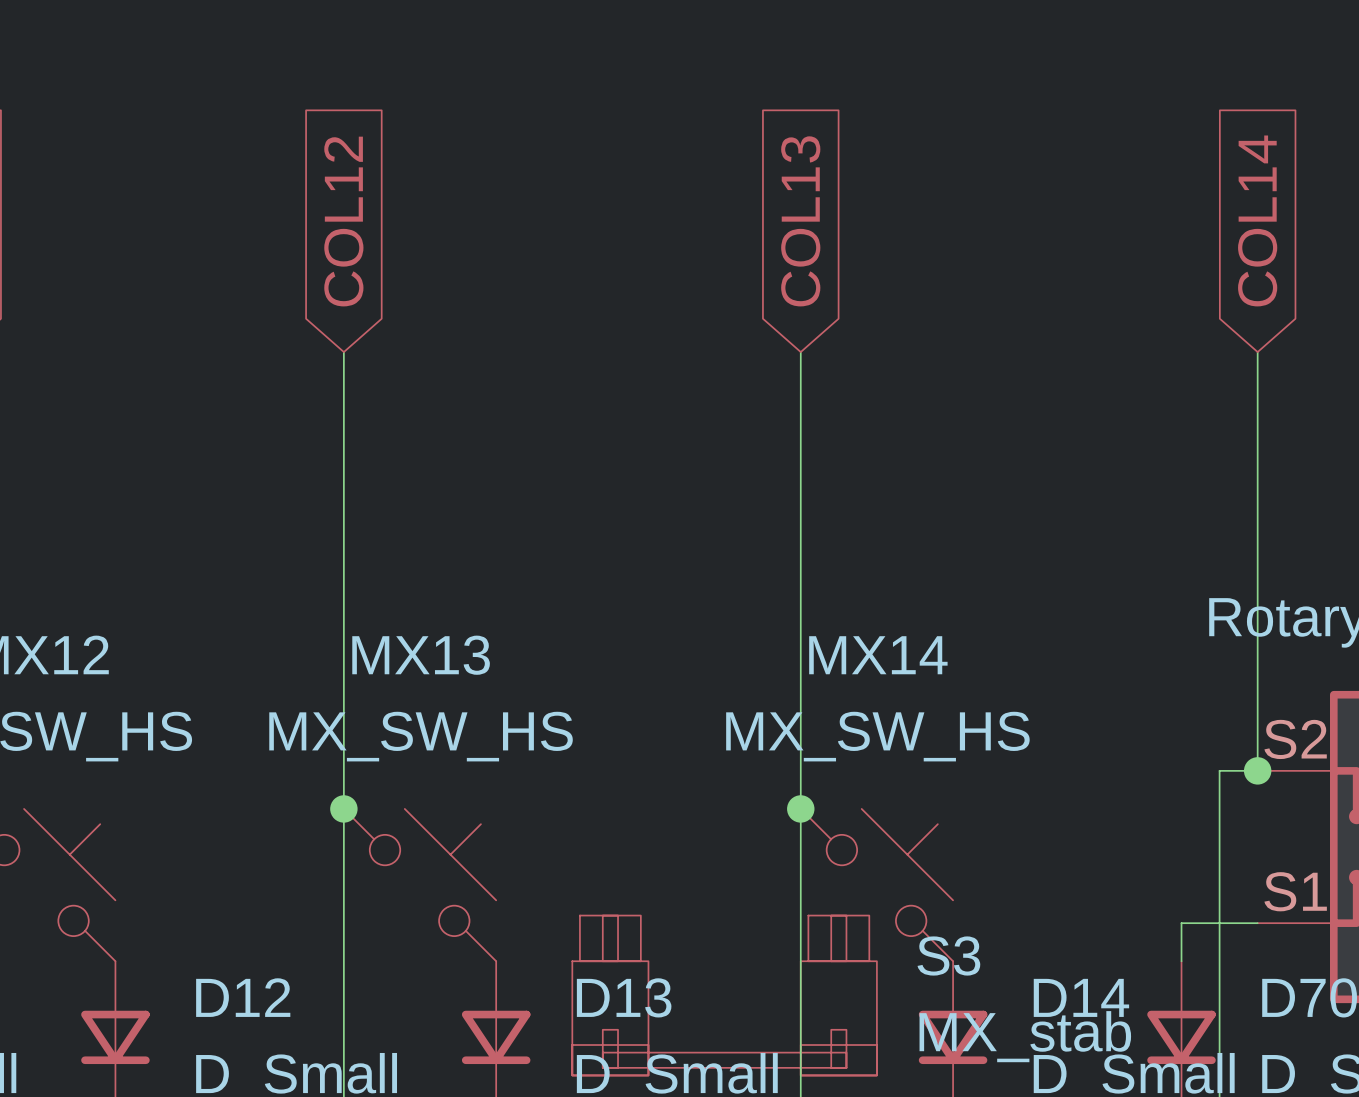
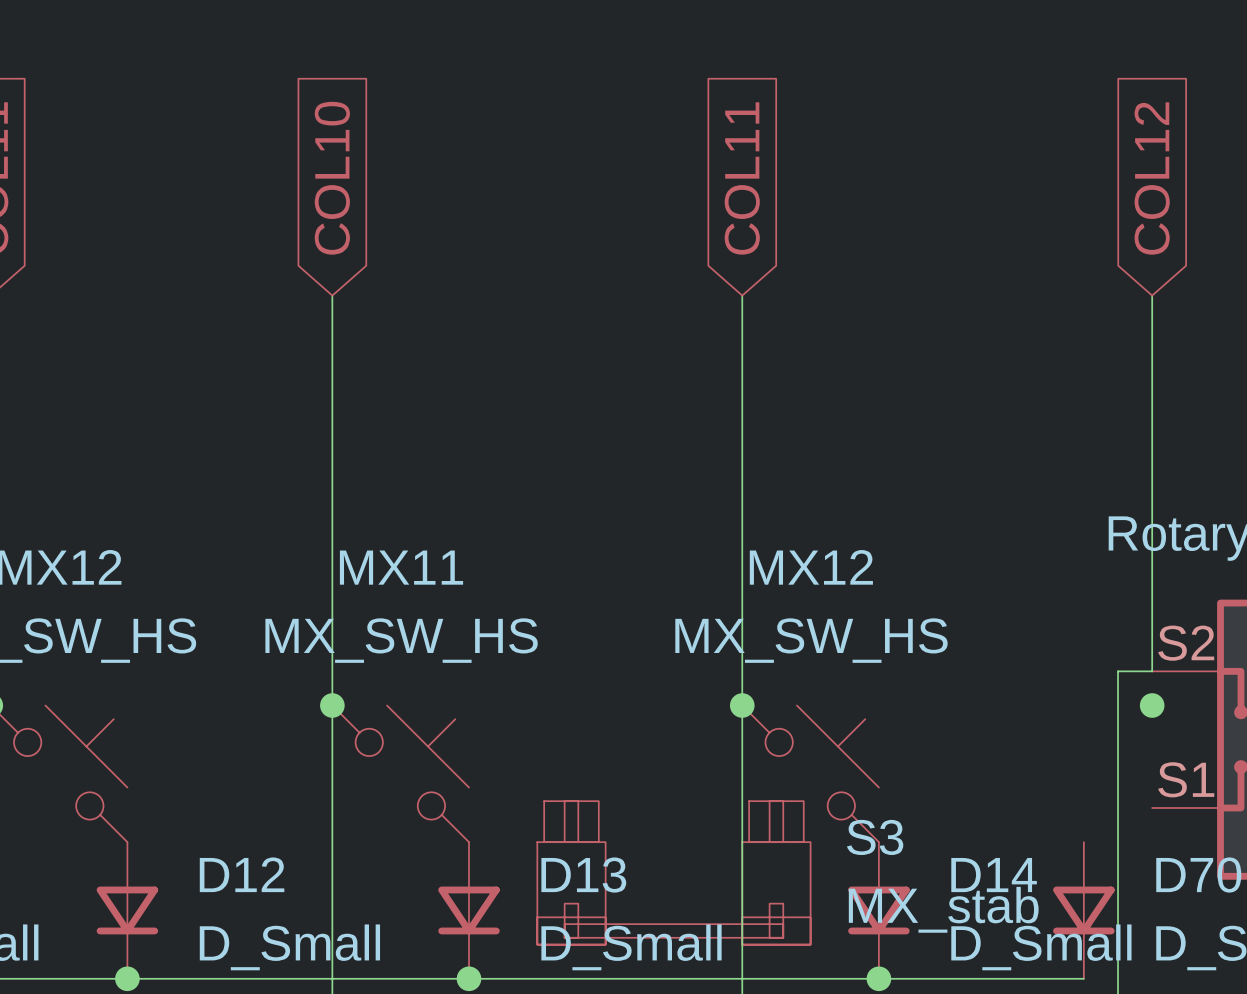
global label: COL14 (1257, 220) -> COL12 (1152, 178)
global label: COL12 (343, 221) -> COL10 (332, 178)
global label: COL13 (800, 221) -> COL11 (742, 178)
MX13 name: MX13 (421, 655) -> MX11 (401, 567)
MX14 name: MX14 (878, 655) -> MX12 (811, 567)
junction position: (1257, 770) -> (1152, 705)
wire: (1257, 923) (1181, 923) (1181, 961) -> none

